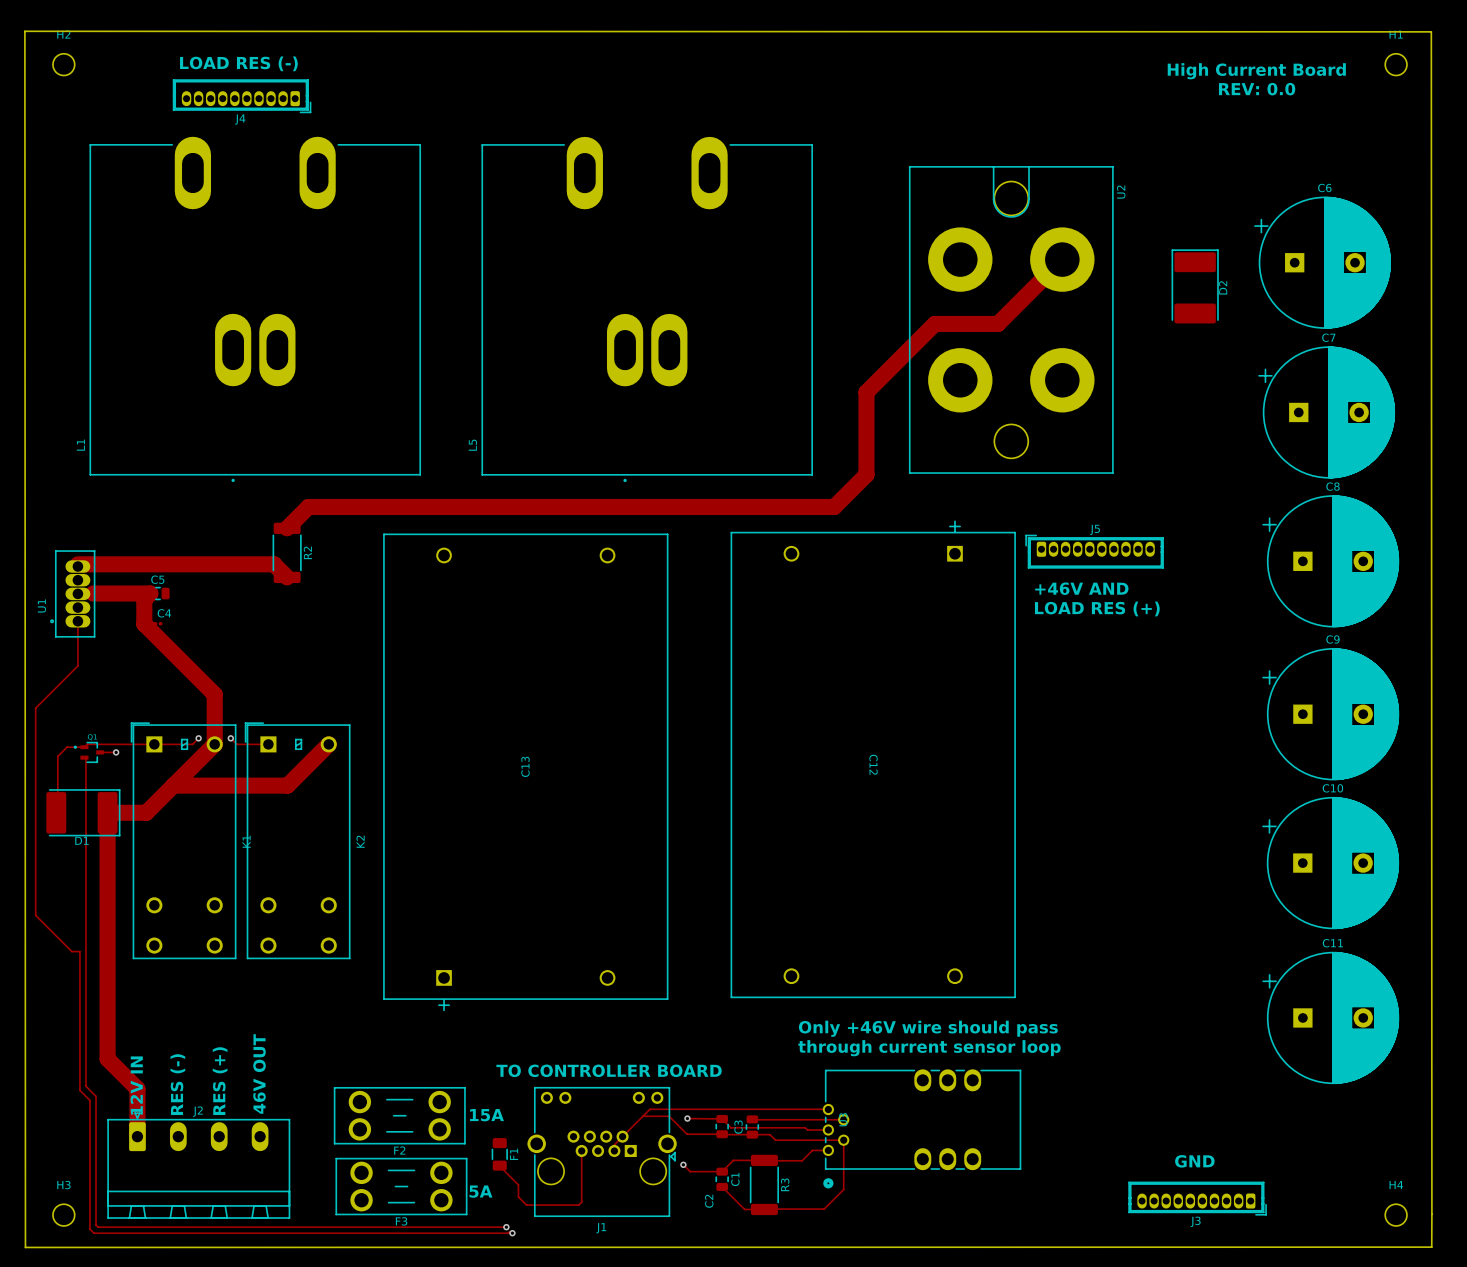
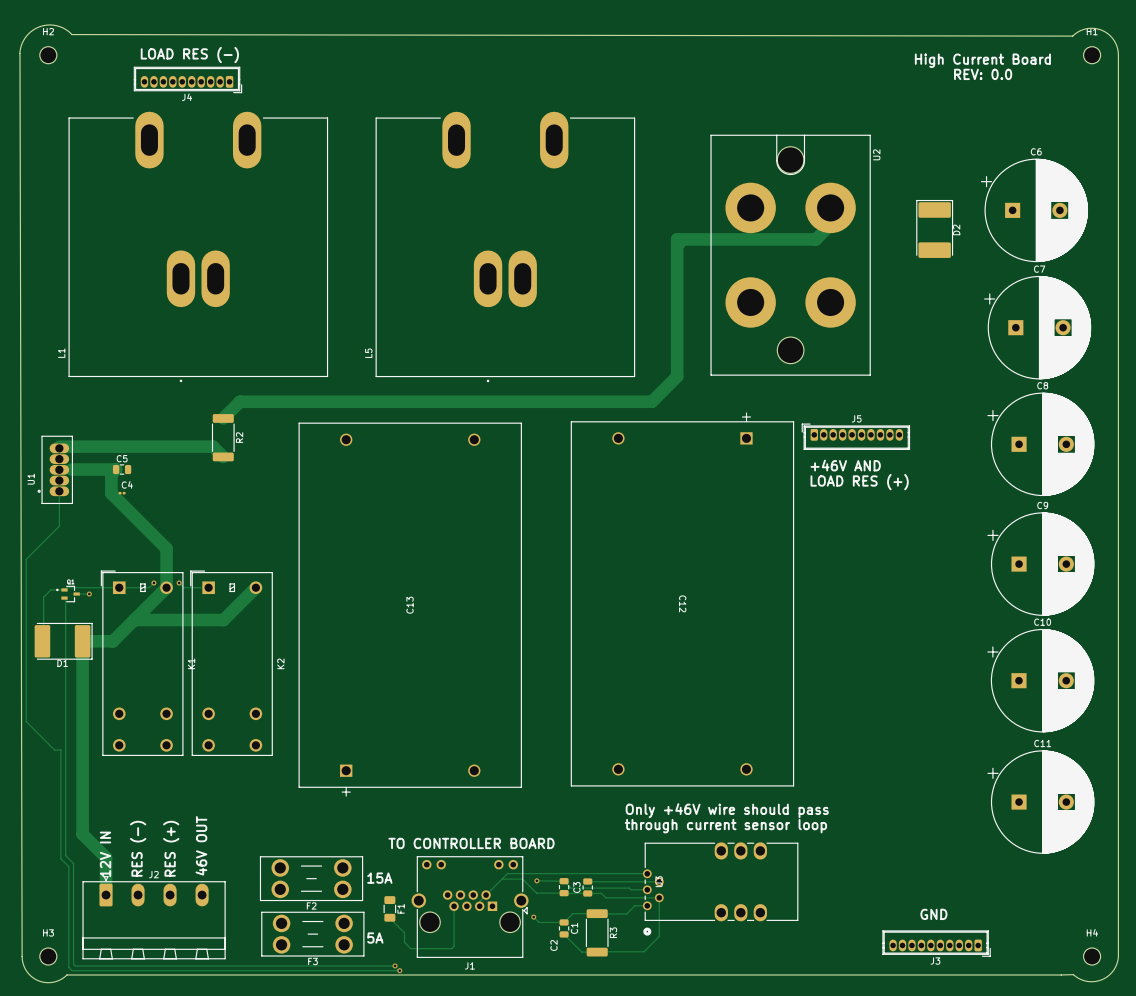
board edge: (24, 31) (25, 1247) (1431, 1247) (1431, 31) (24, 31) -> none
board edge: none -> (19, 53) (22, 43) (28, 34) (36, 28) (50, 24) (60, 26) (71, 34) (1072, 36) (1083, 29) (1092, 28) (1101, 30) (1109, 35) (1116, 45) (1118, 55) (1118, 956) (1112, 971) (1101, 979) (1091, 981) (1081, 979) (1073, 974) (66, 974) (59, 980) (47, 982) (38, 980) (30, 975) (24, 968) (22, 956) (19, 53)
track: (1062, 259) (997, 323) (934, 323) (866, 392) -> (677, 242) (677, 311)
track: none -> (825, 229) (815, 239) (677, 239) (680, 242)

